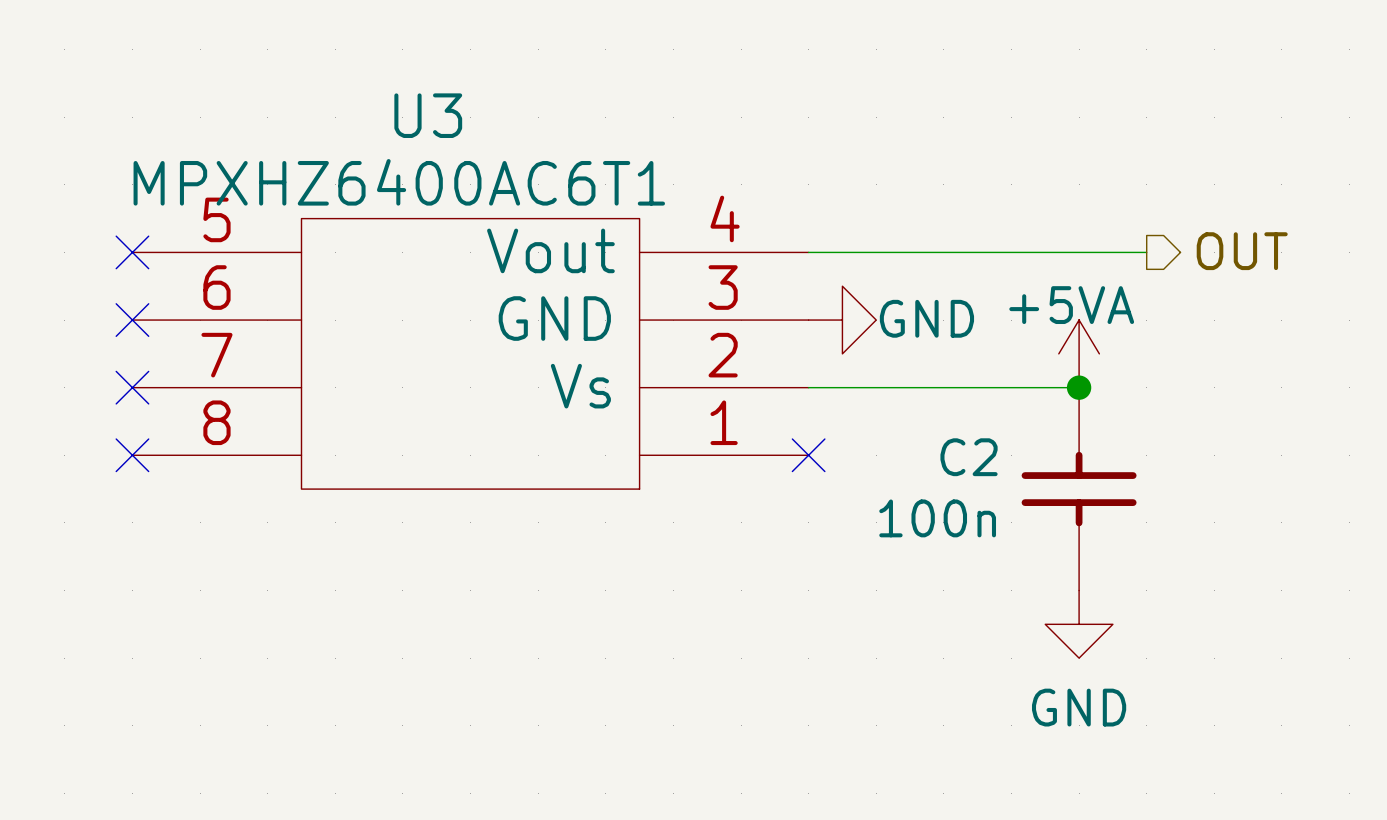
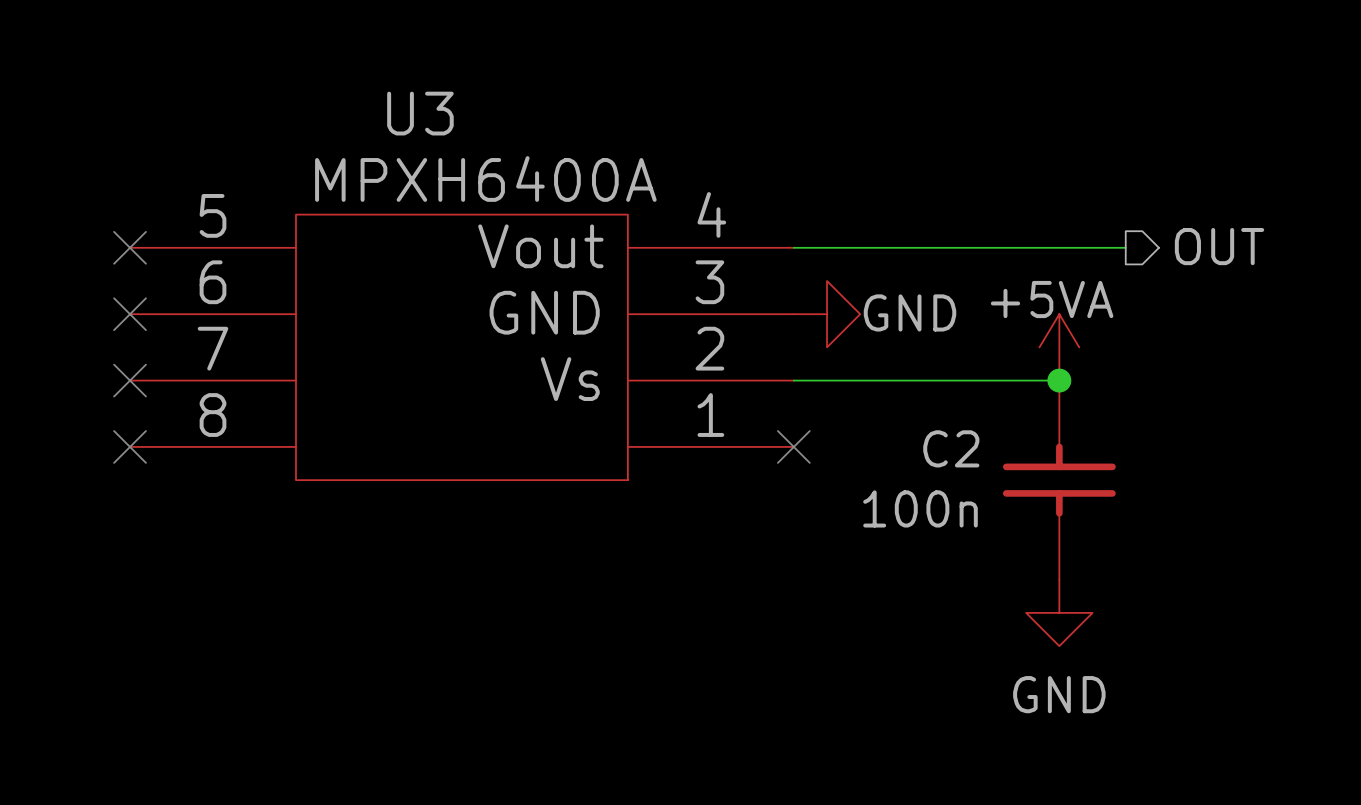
U3 value: MPXHZ6400AC6T1 (399, 182) -> MPXH6400A (485, 178)

